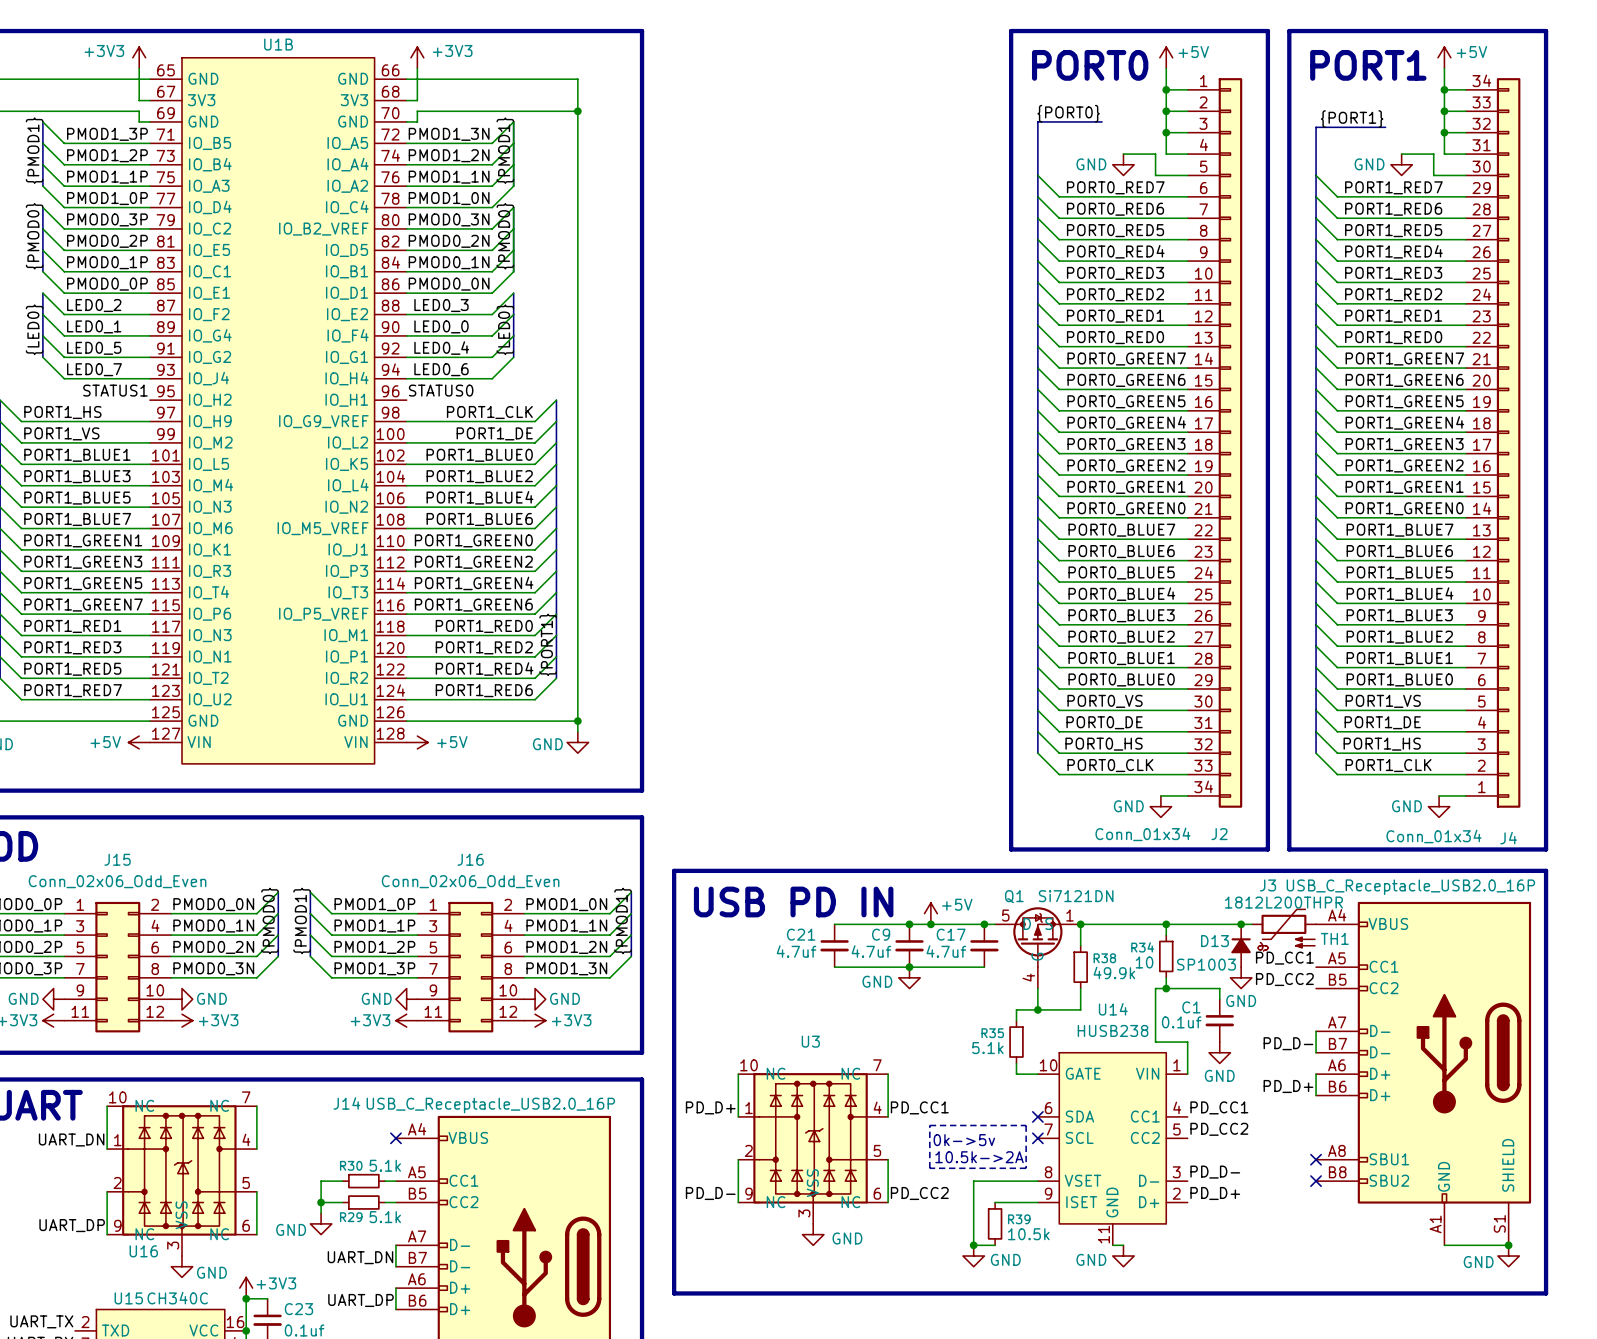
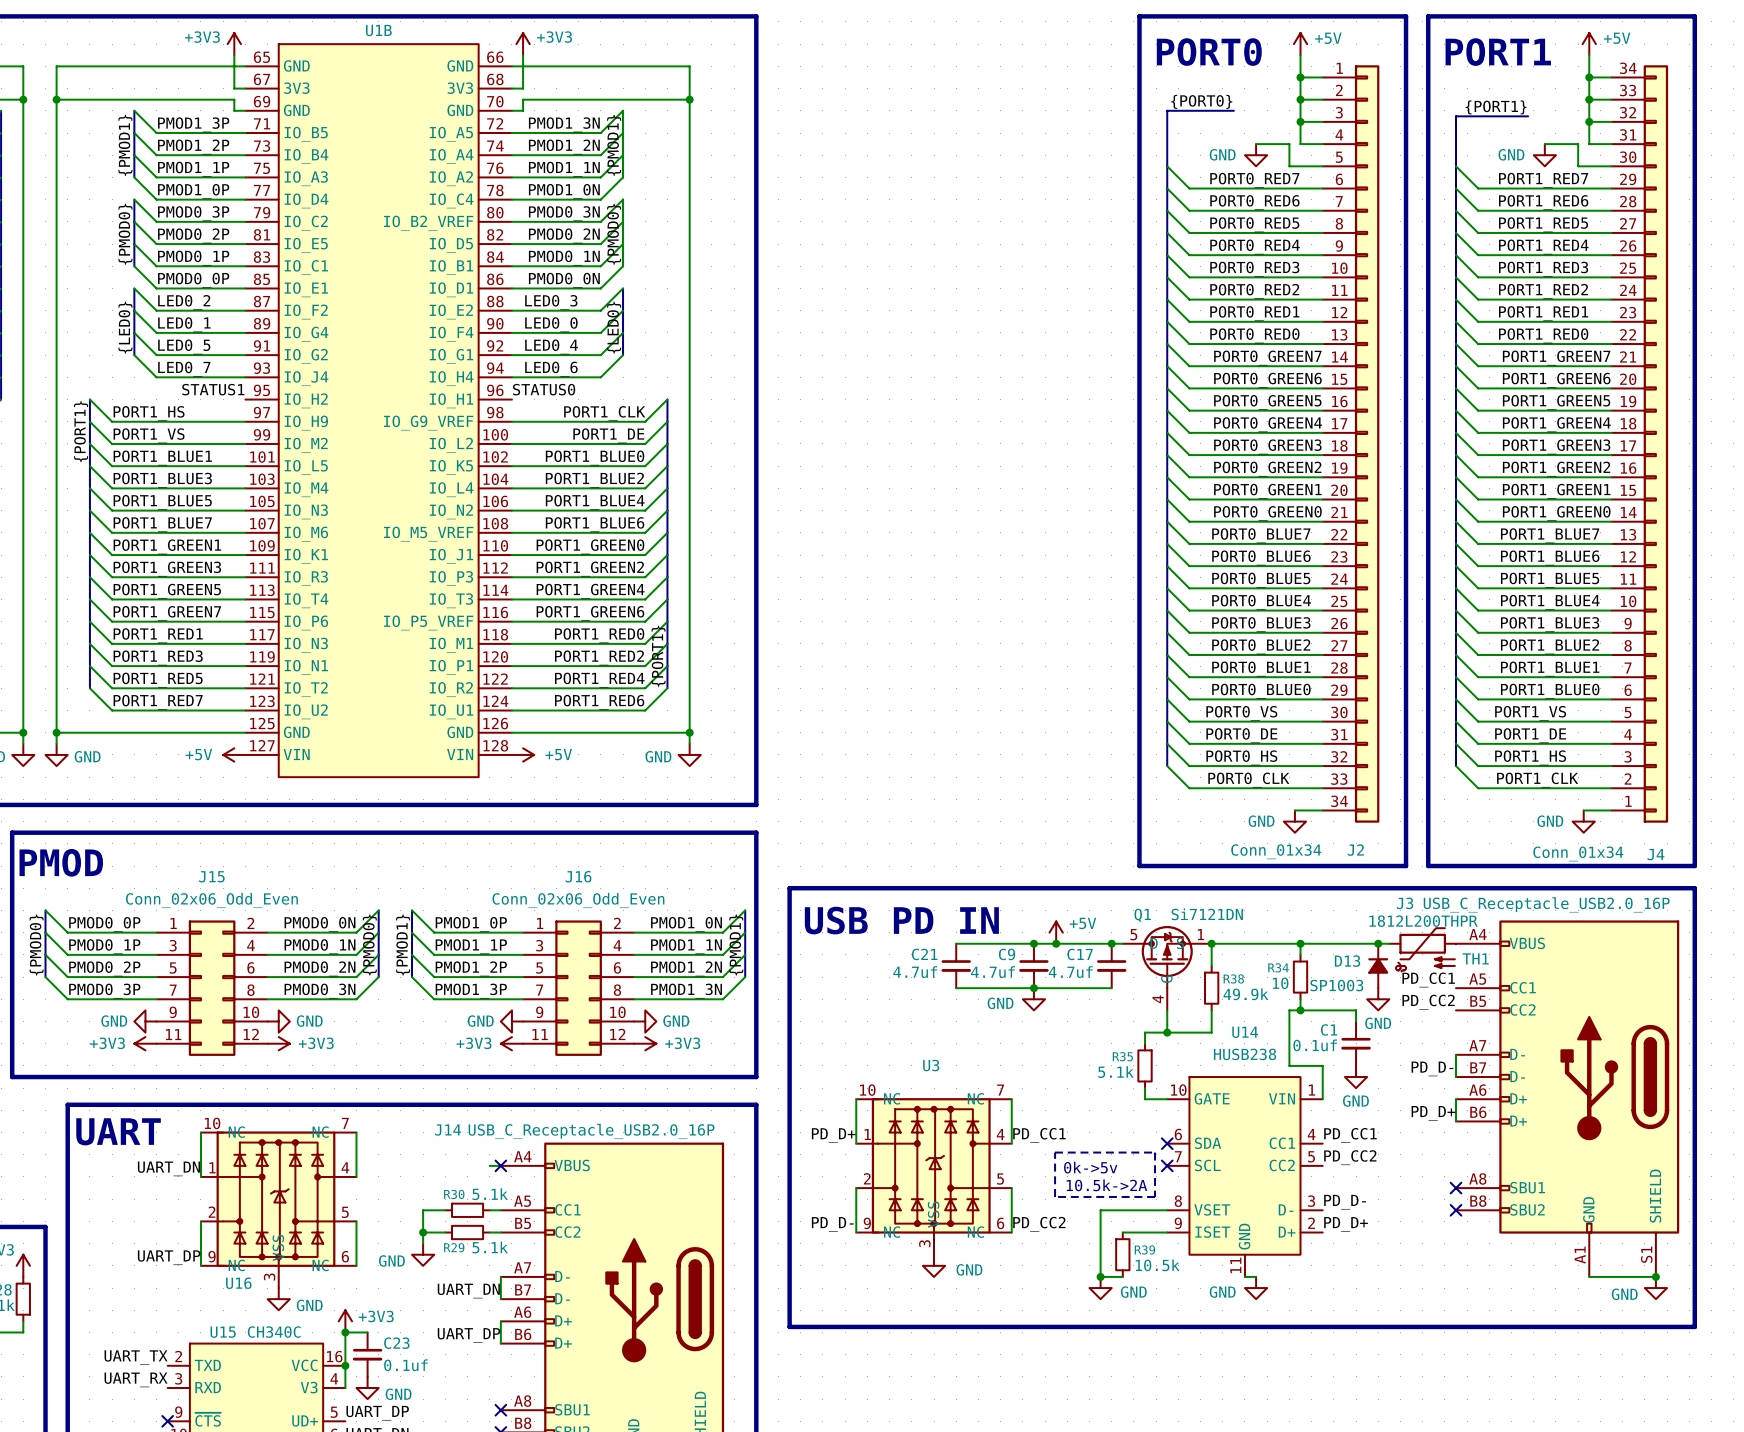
wire: none -> (489, 1165) (500, 1165)

